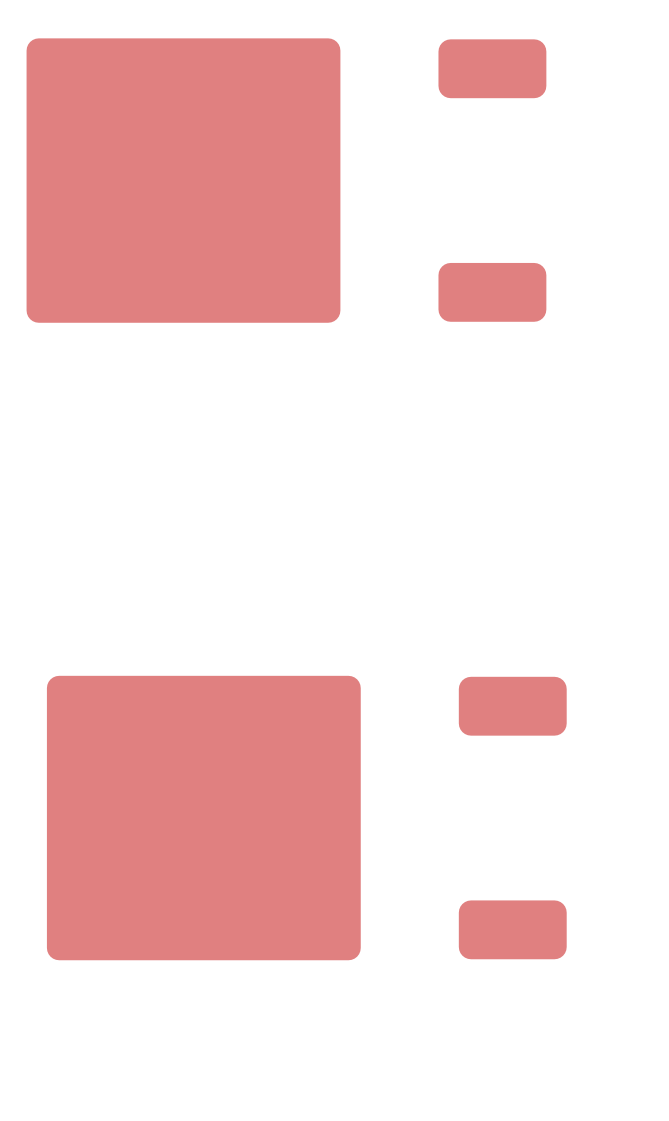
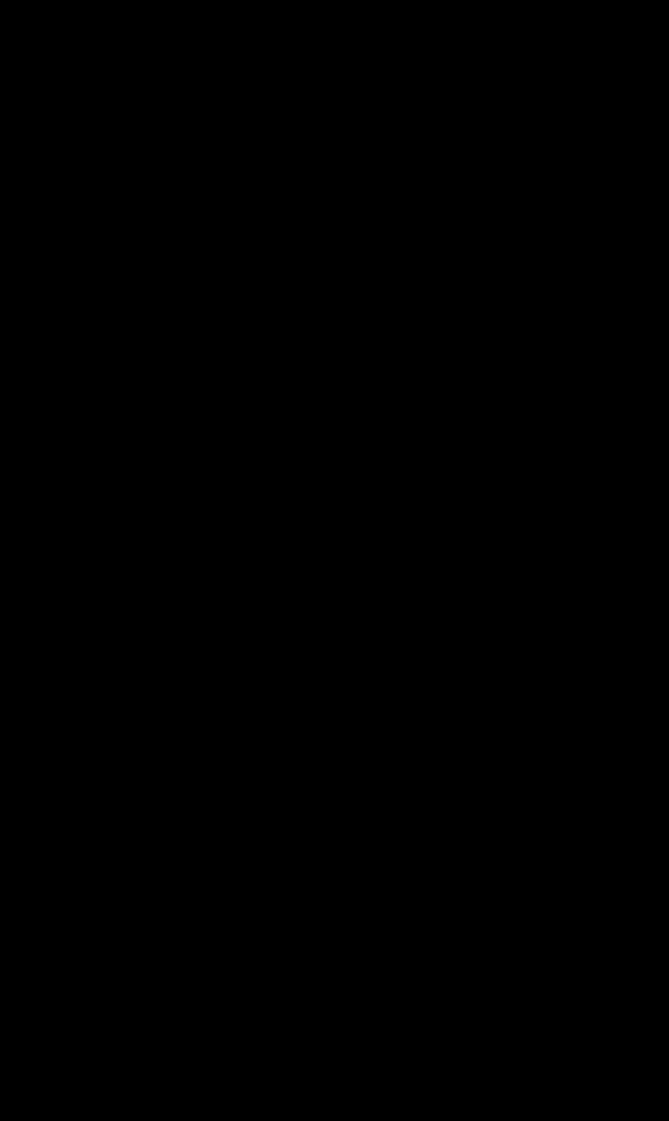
part: (286, 180) -> none
part: (306, 818) -> none

